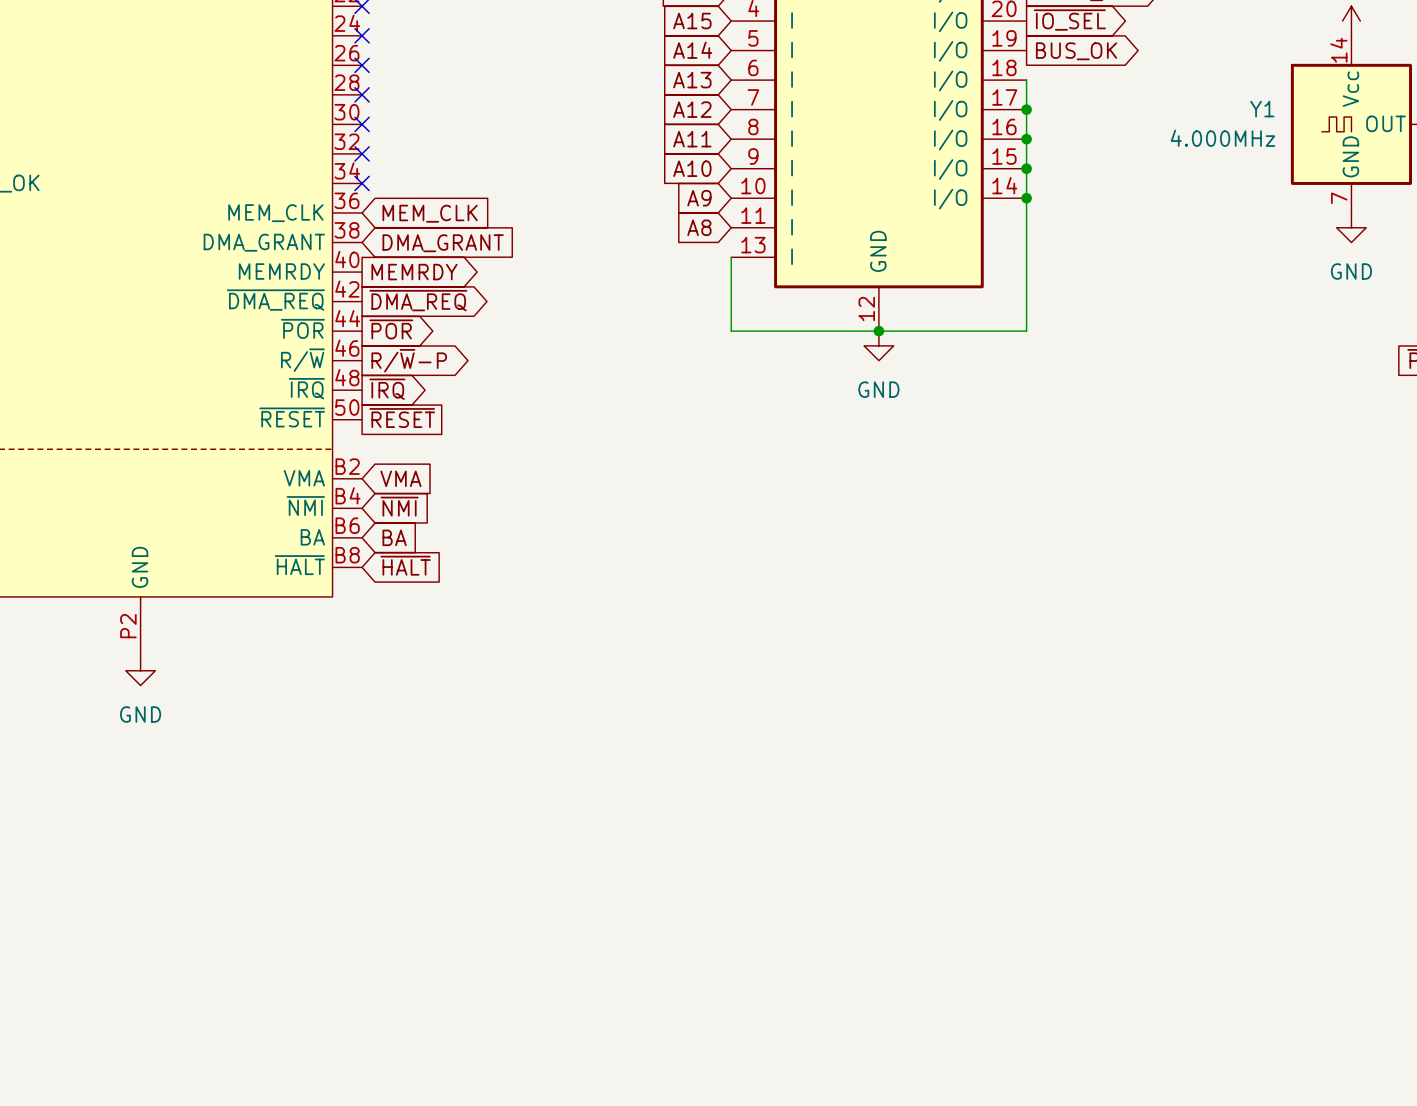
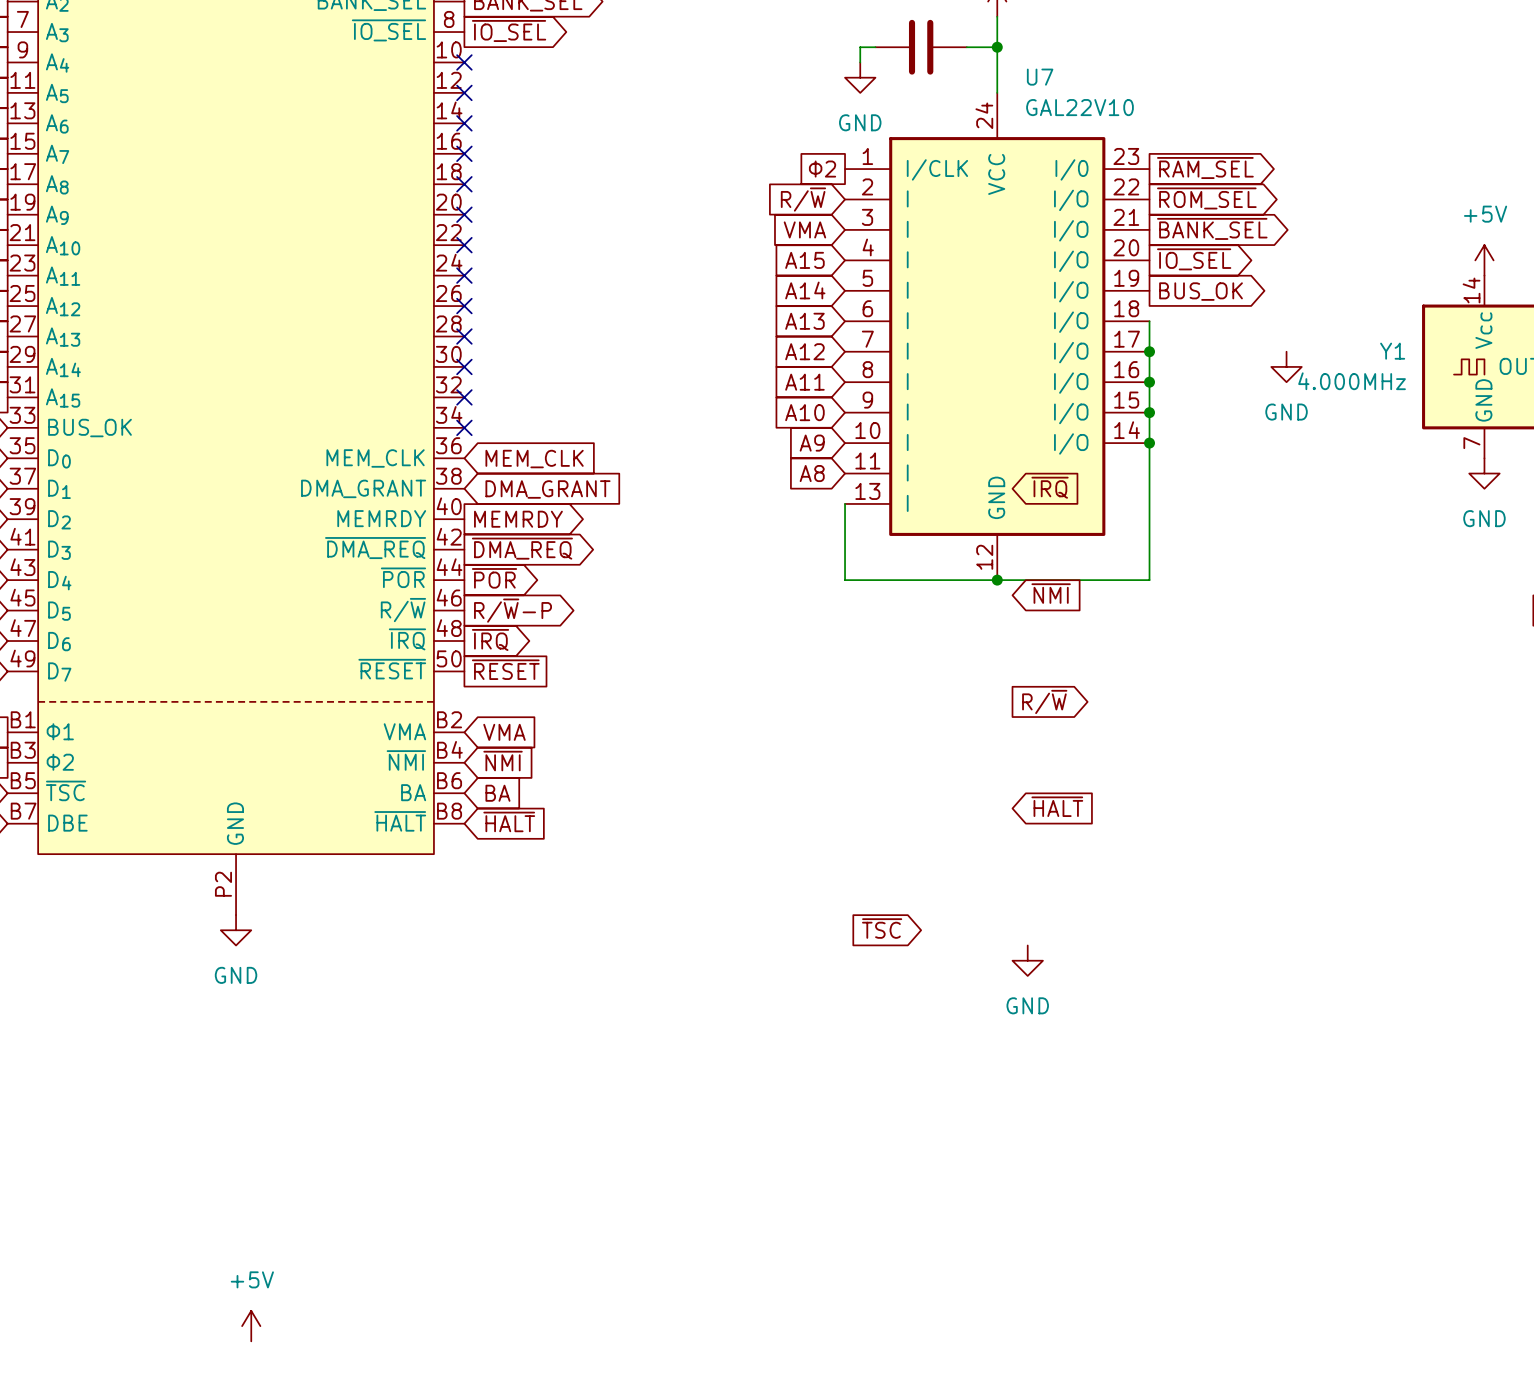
power symbol: none -> GND (1286, 366)
global label: none -> ~{IRQ} (1050, 487)
global label: none -> ~{NMI} (1051, 593)
power symbol: GND (878, 345) -> none
global label: none -> R/~{W} (1044, 701)
global label: none -> ~{HALT} (1057, 806)
global label: none -> ~{TSC} (882, 928)
power symbol: none -> GND (1027, 960)
power symbol: none -> +5V (251, 1326)

